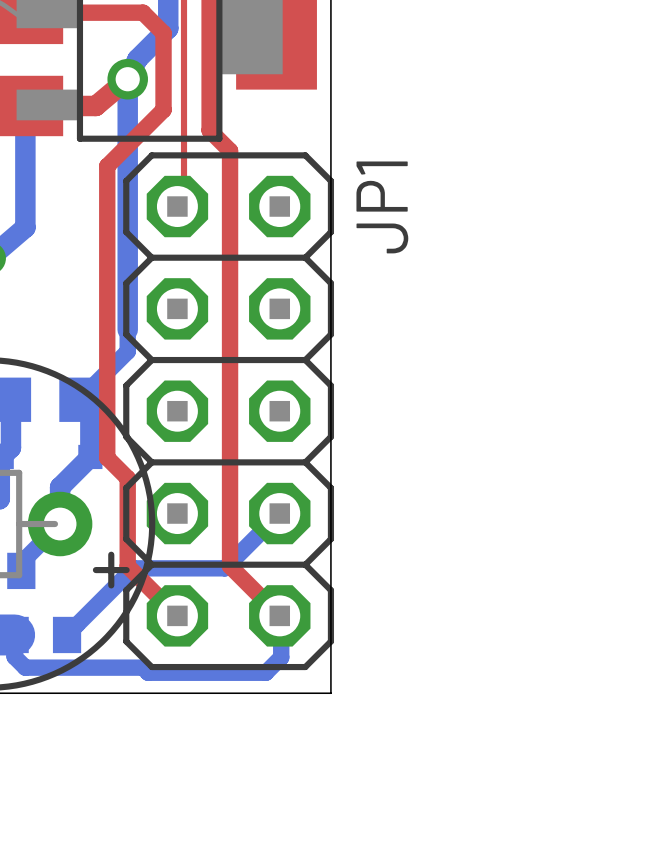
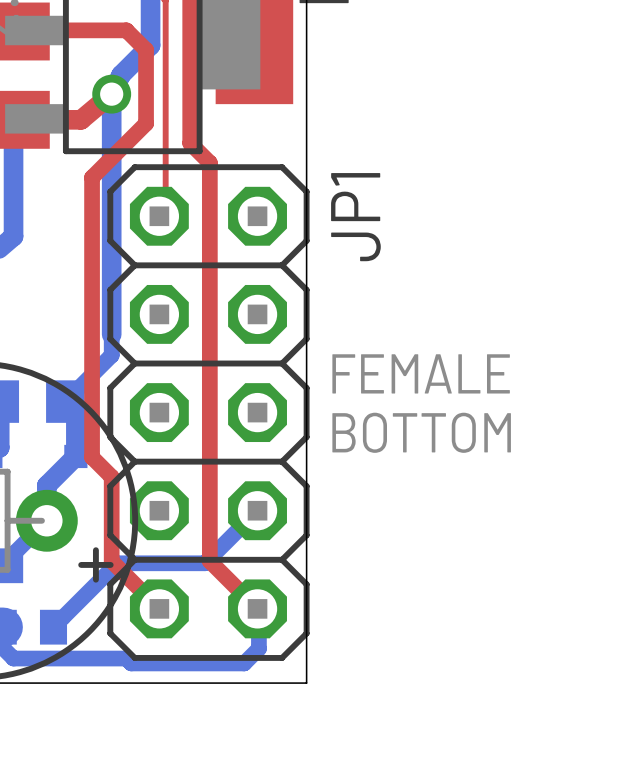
text: none -> FEMALE (421, 373)
text: none -> BOTTOM (421, 432)

